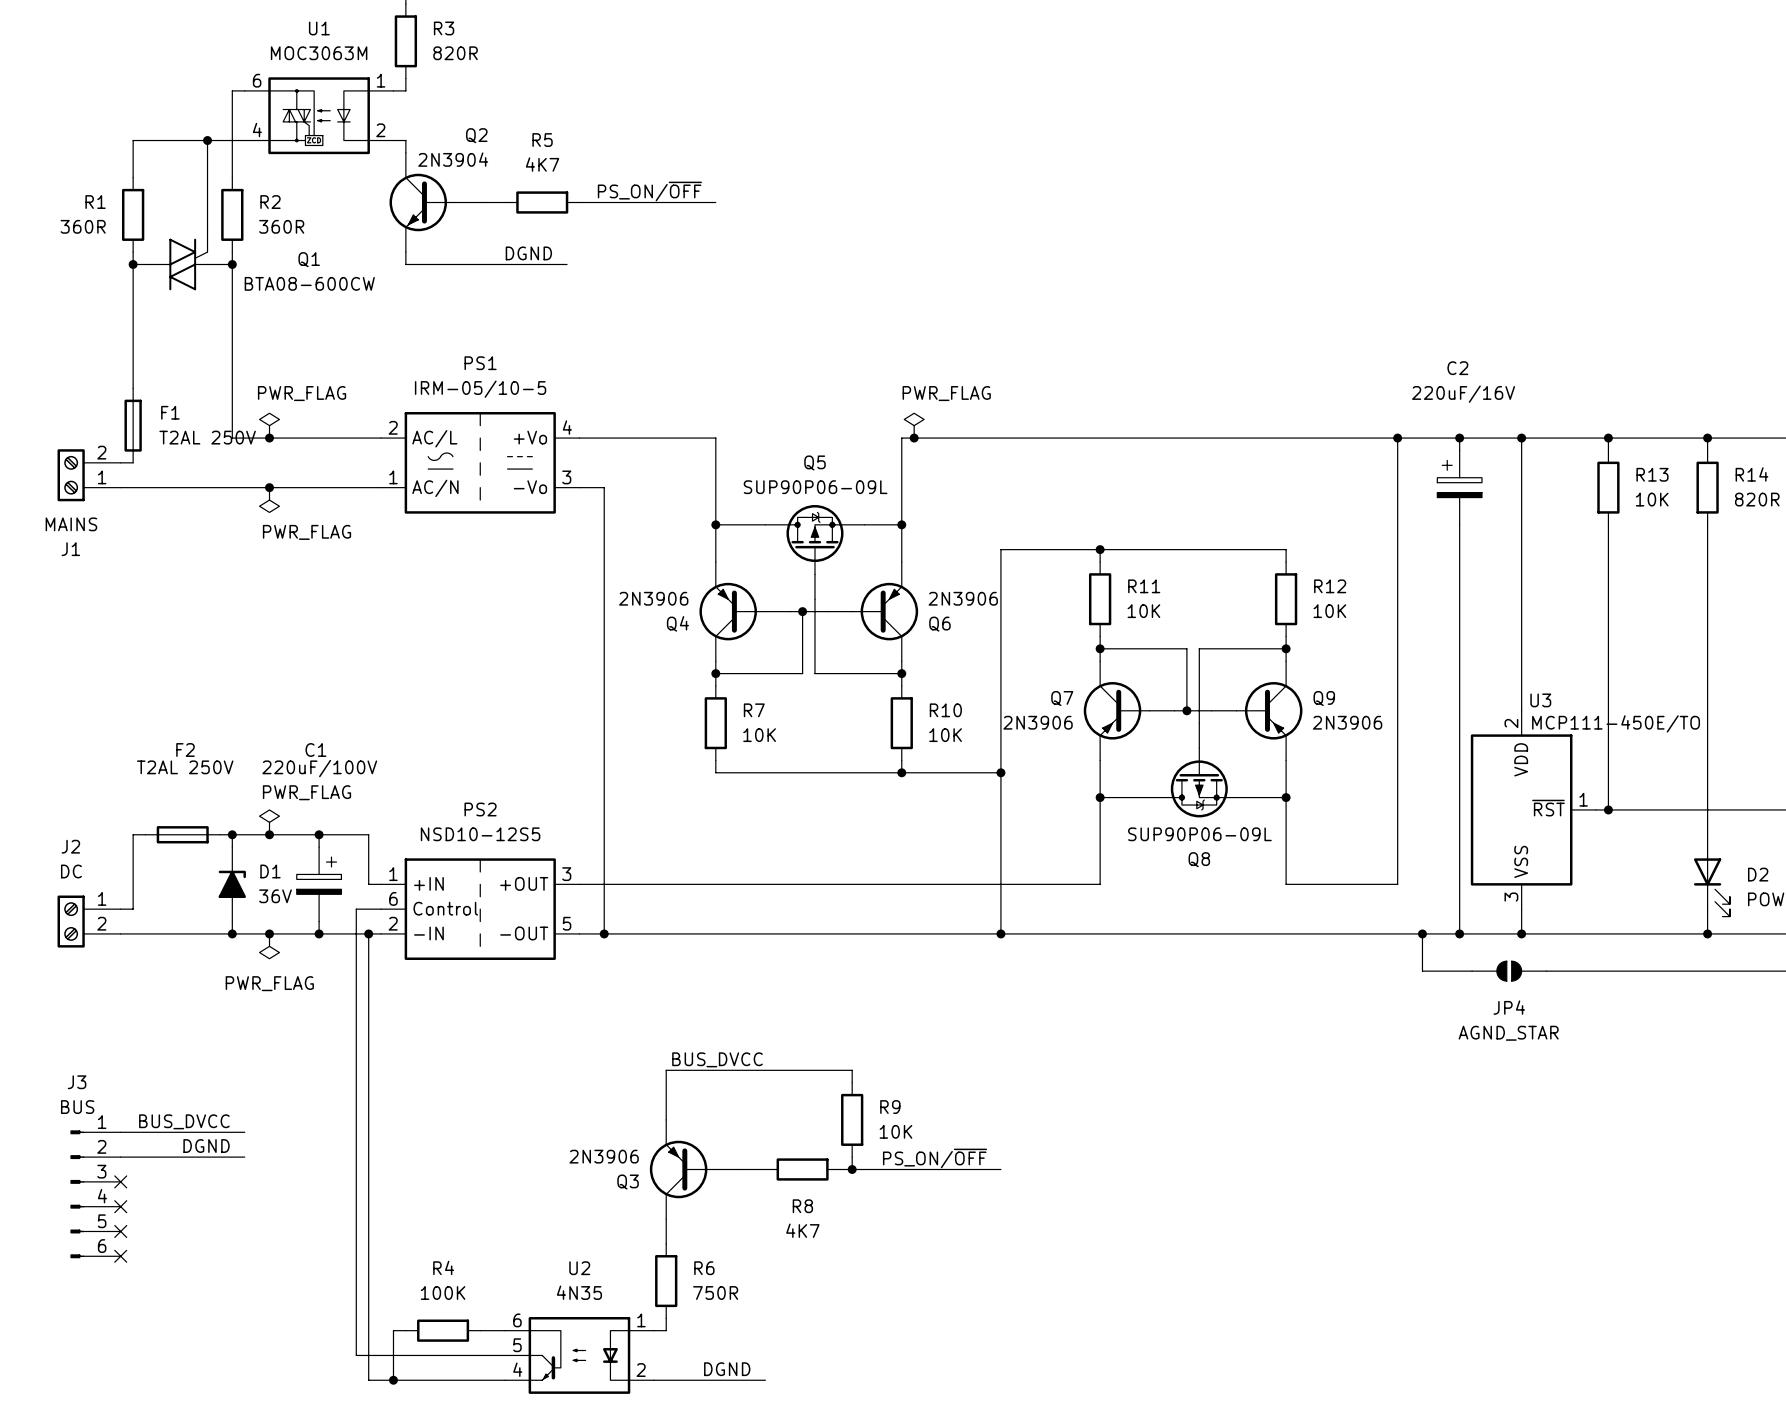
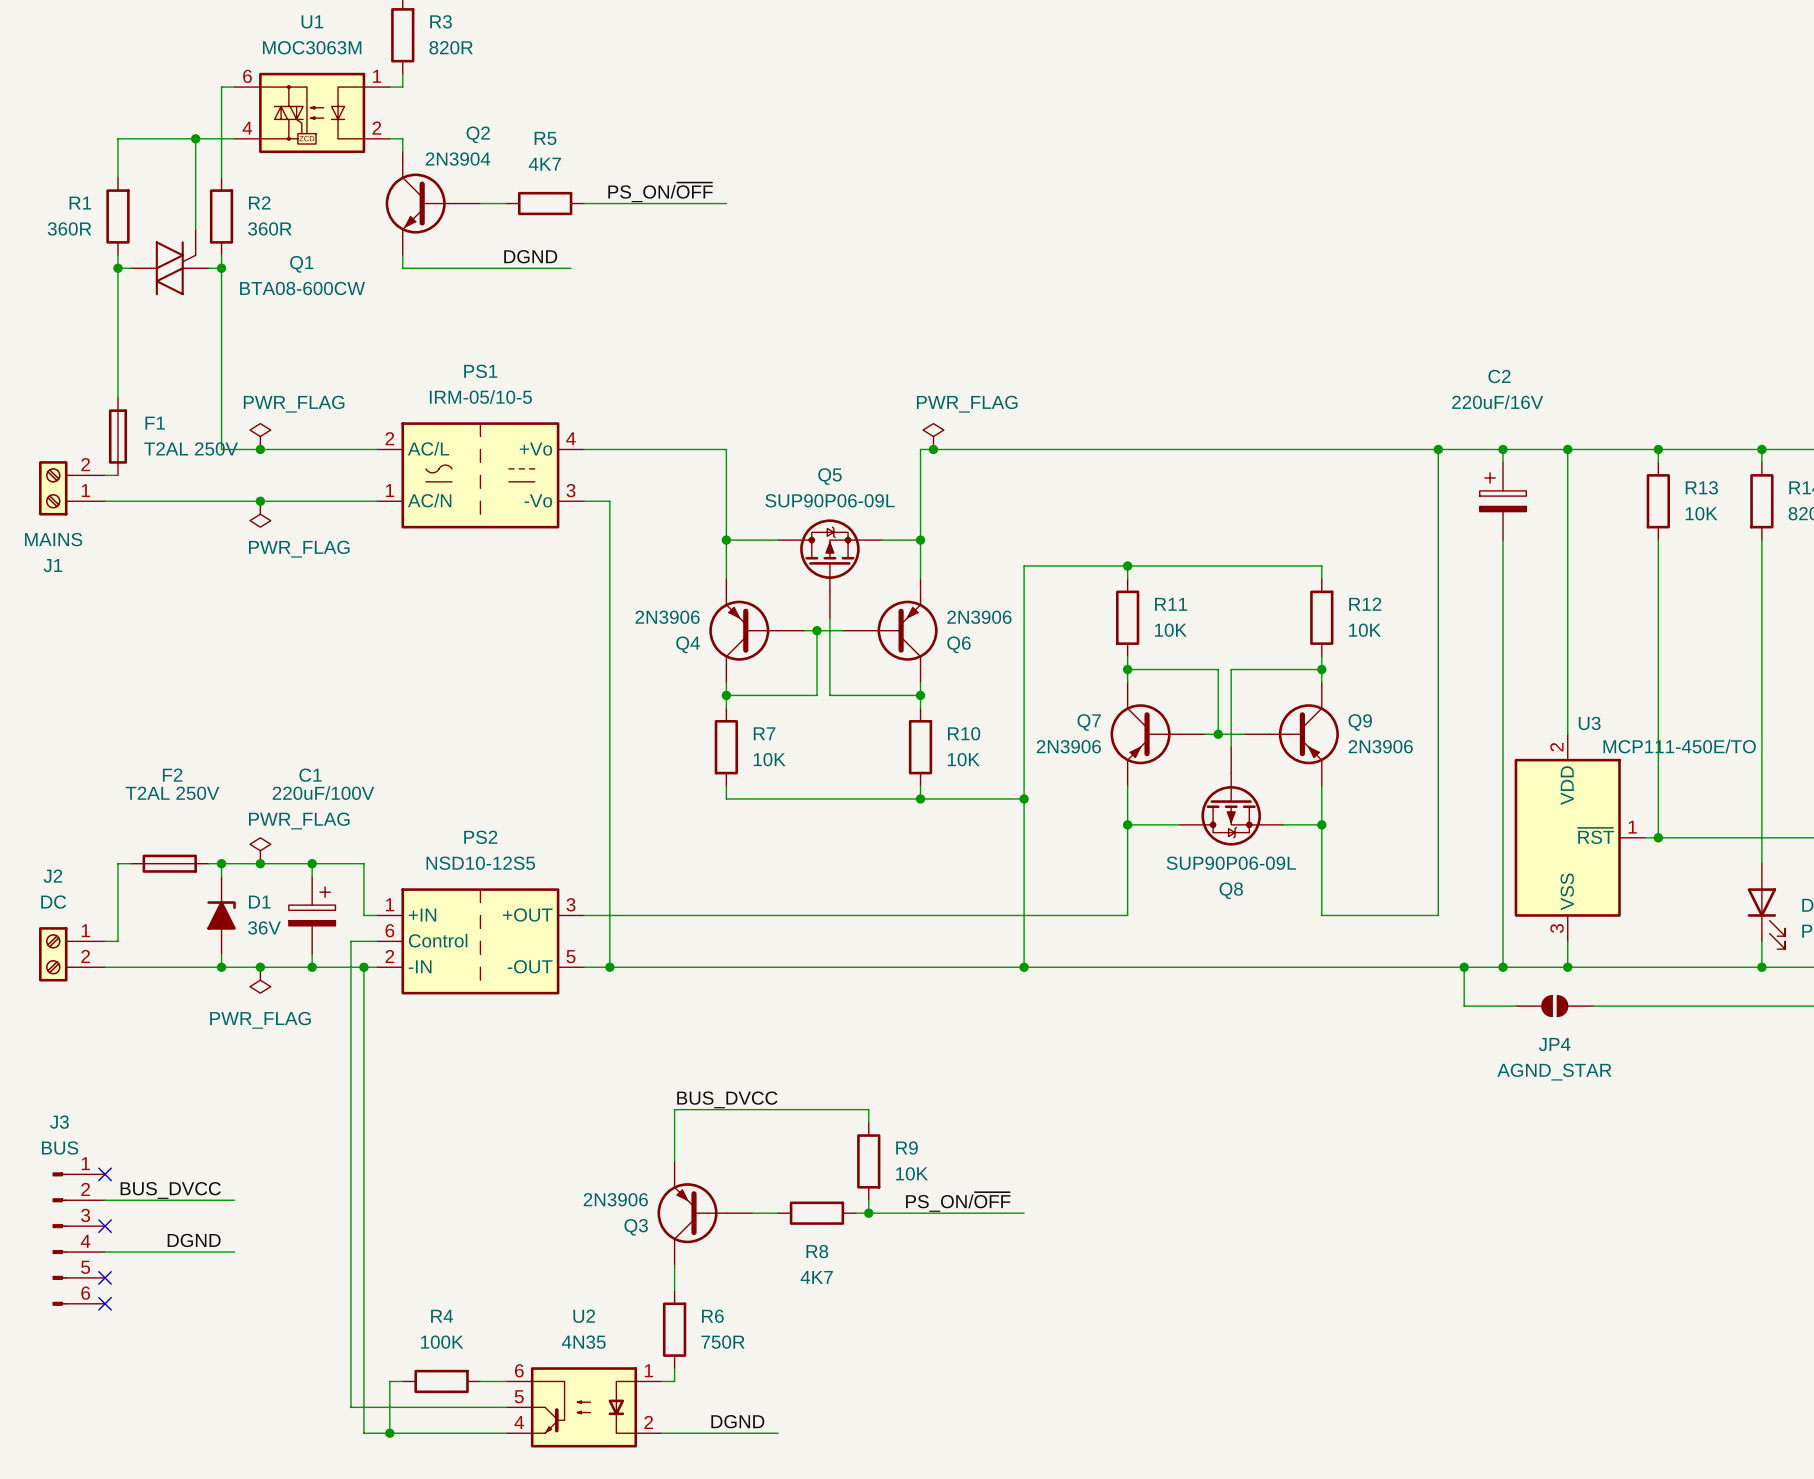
label: BUS_DVCC (184, 1121) -> none
wire: (120, 1132) (244, 1132) -> (105, 1252) (234, 1252)
no-connect mark: none -> (105, 1174)
label: DGND (206, 1146) -> BUS_DVCC (170, 1190)
label: none -> DGND (194, 1240)
no-connect mark: (120, 1206) -> none

